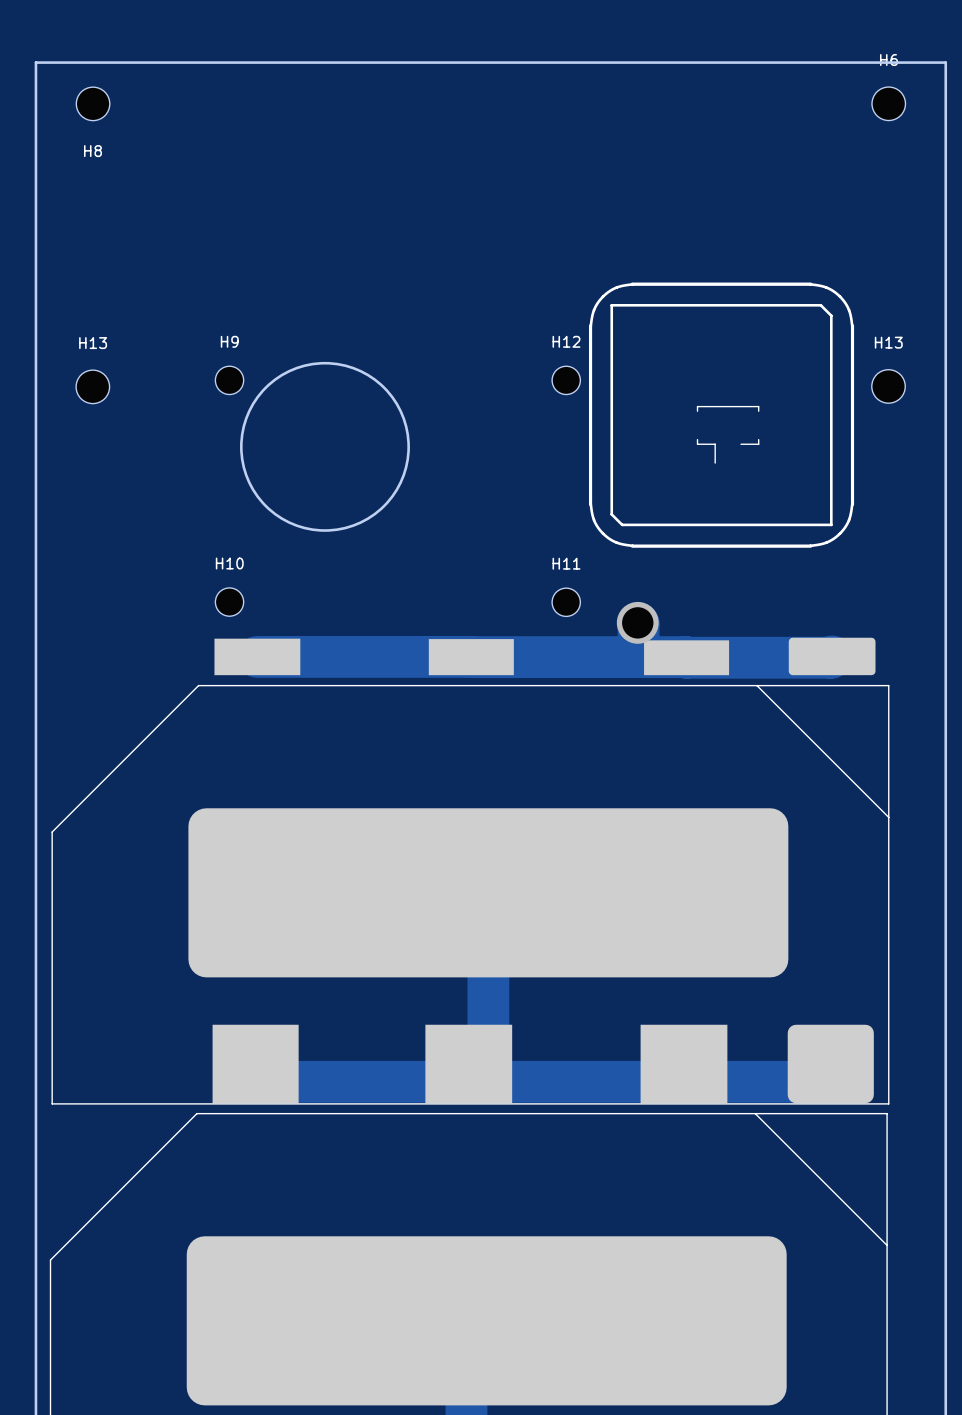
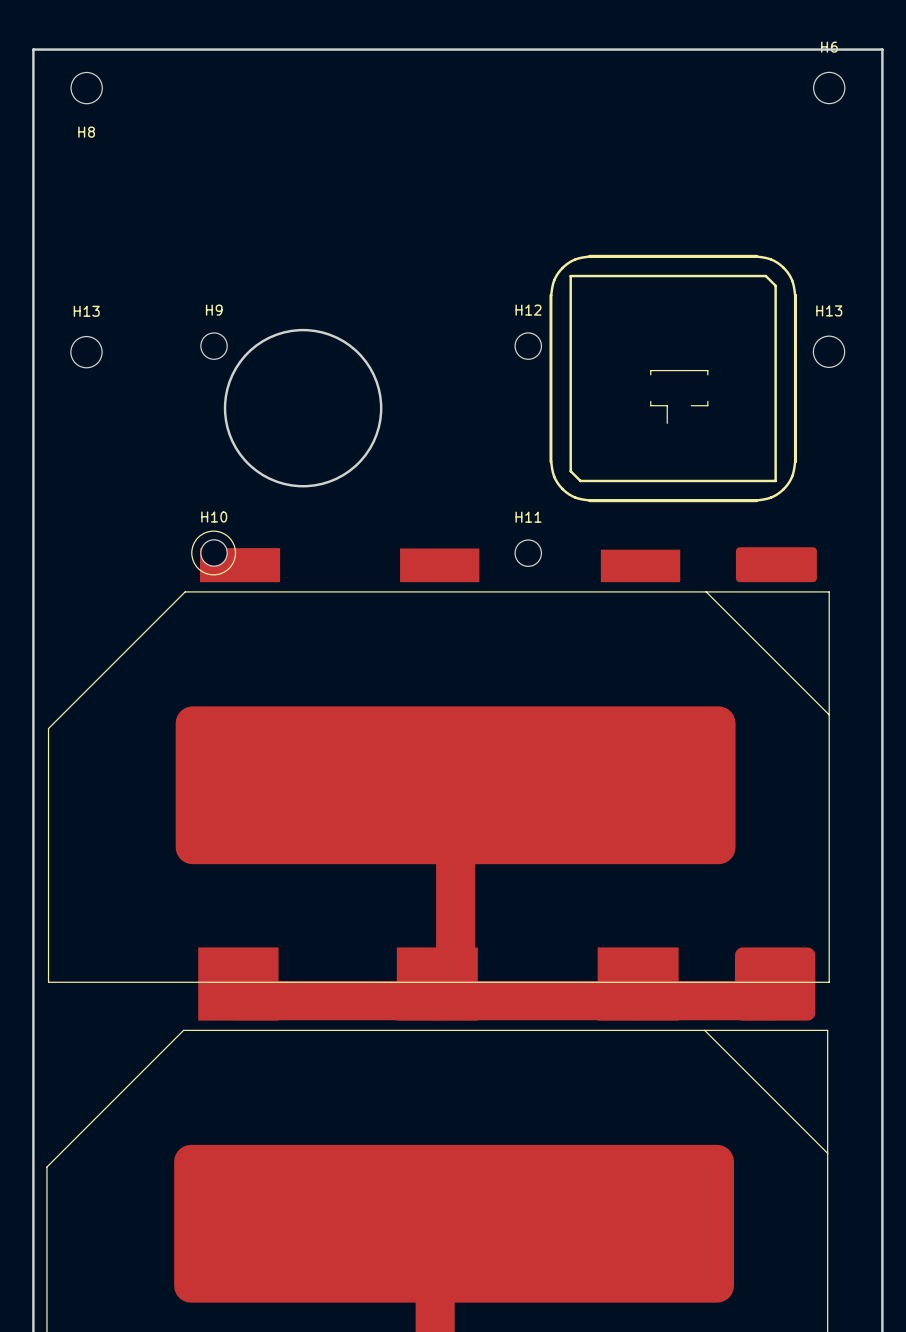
drawing: none -> [191, 530, 236, 576]
via: (637, 622) -> none
track: (832, 656) (257, 656) -> none
part position: (470, 871) -> (438, 765)

